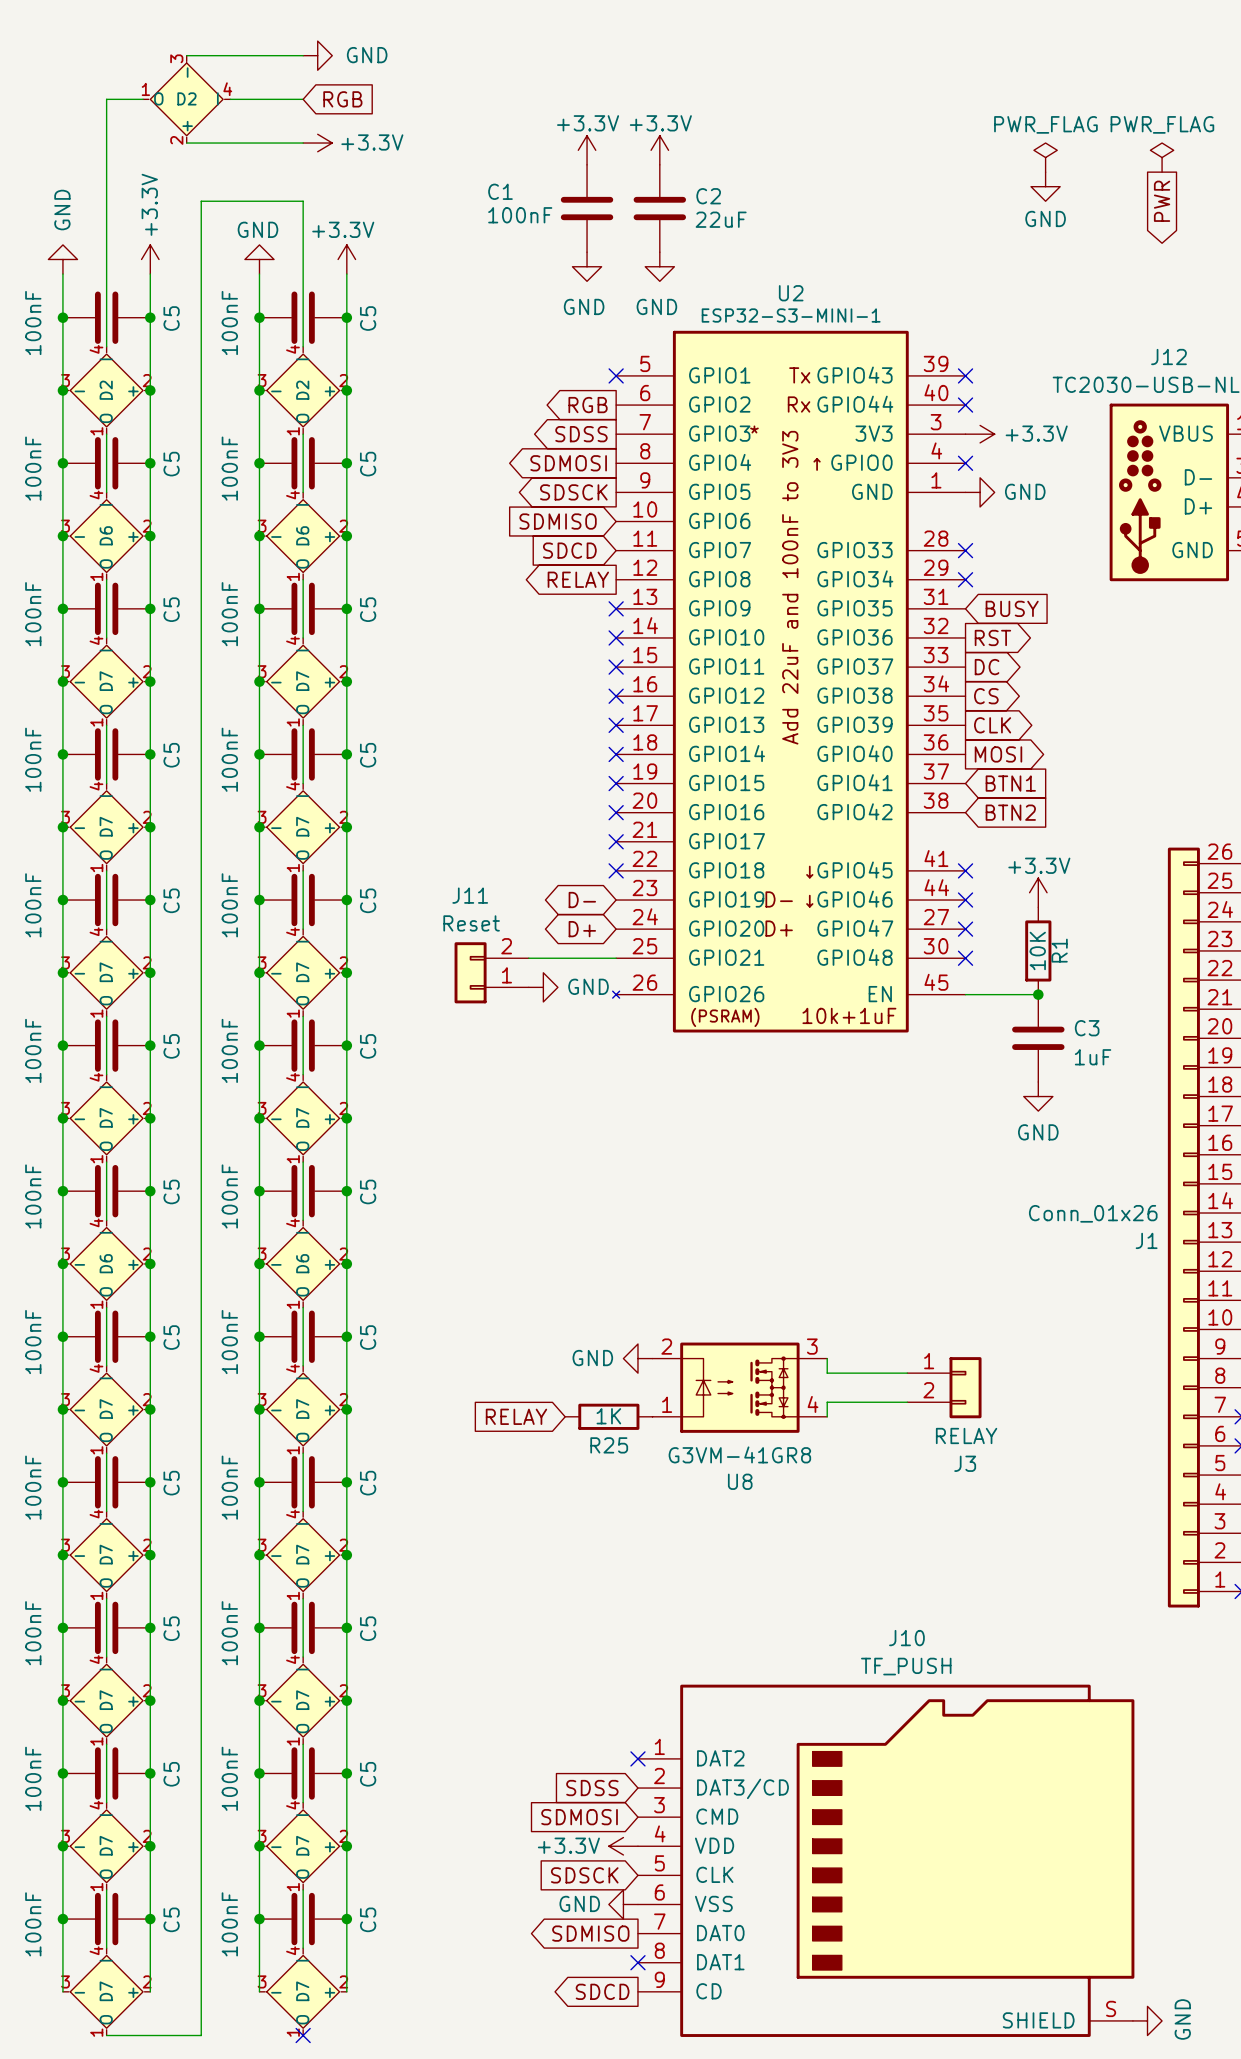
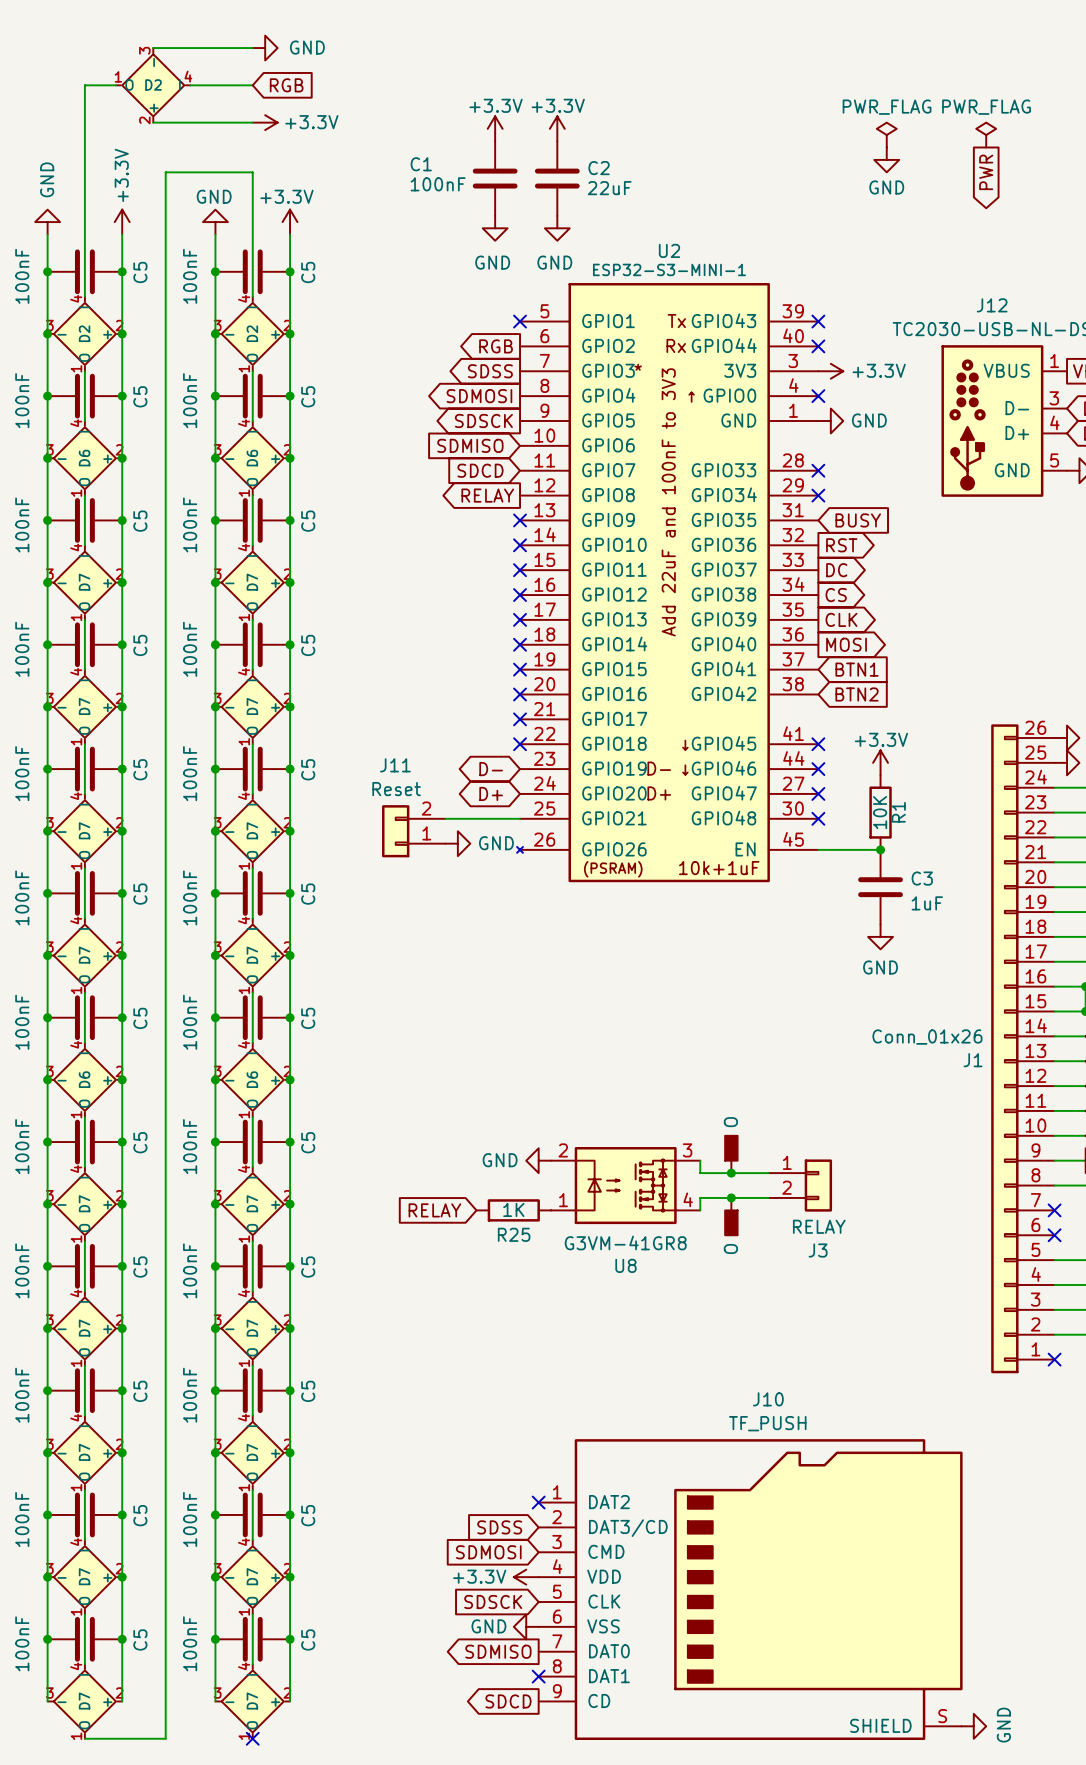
part: none -> O (731, 1154)
junction: none -> (731, 1173)
junction: none -> (731, 1197)
part: none -> O (731, 1216)

